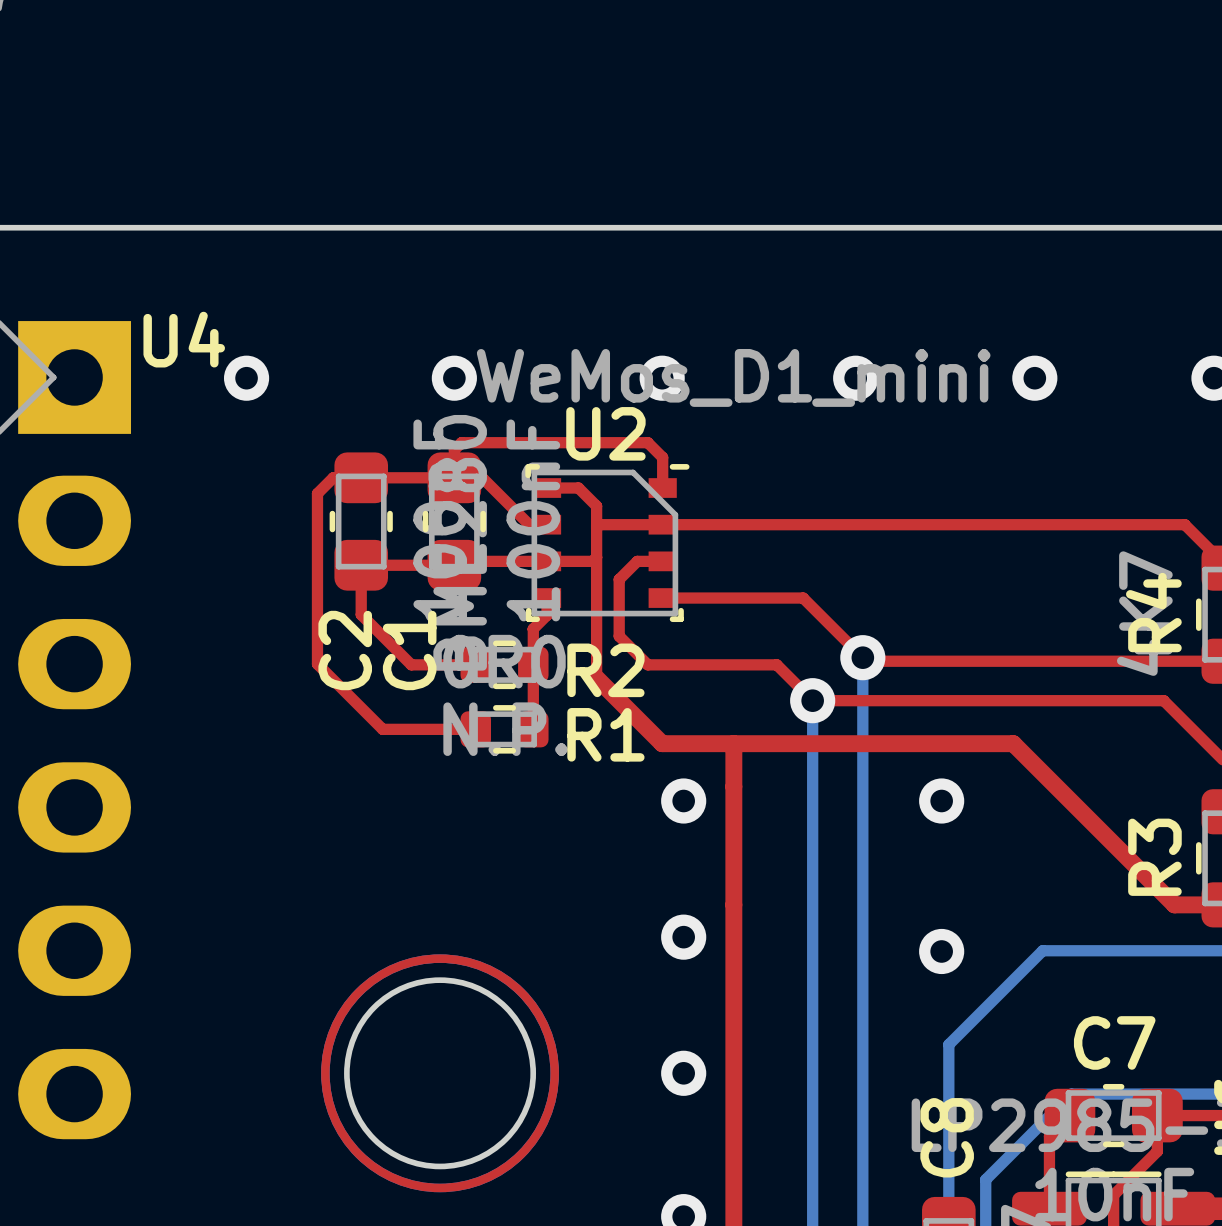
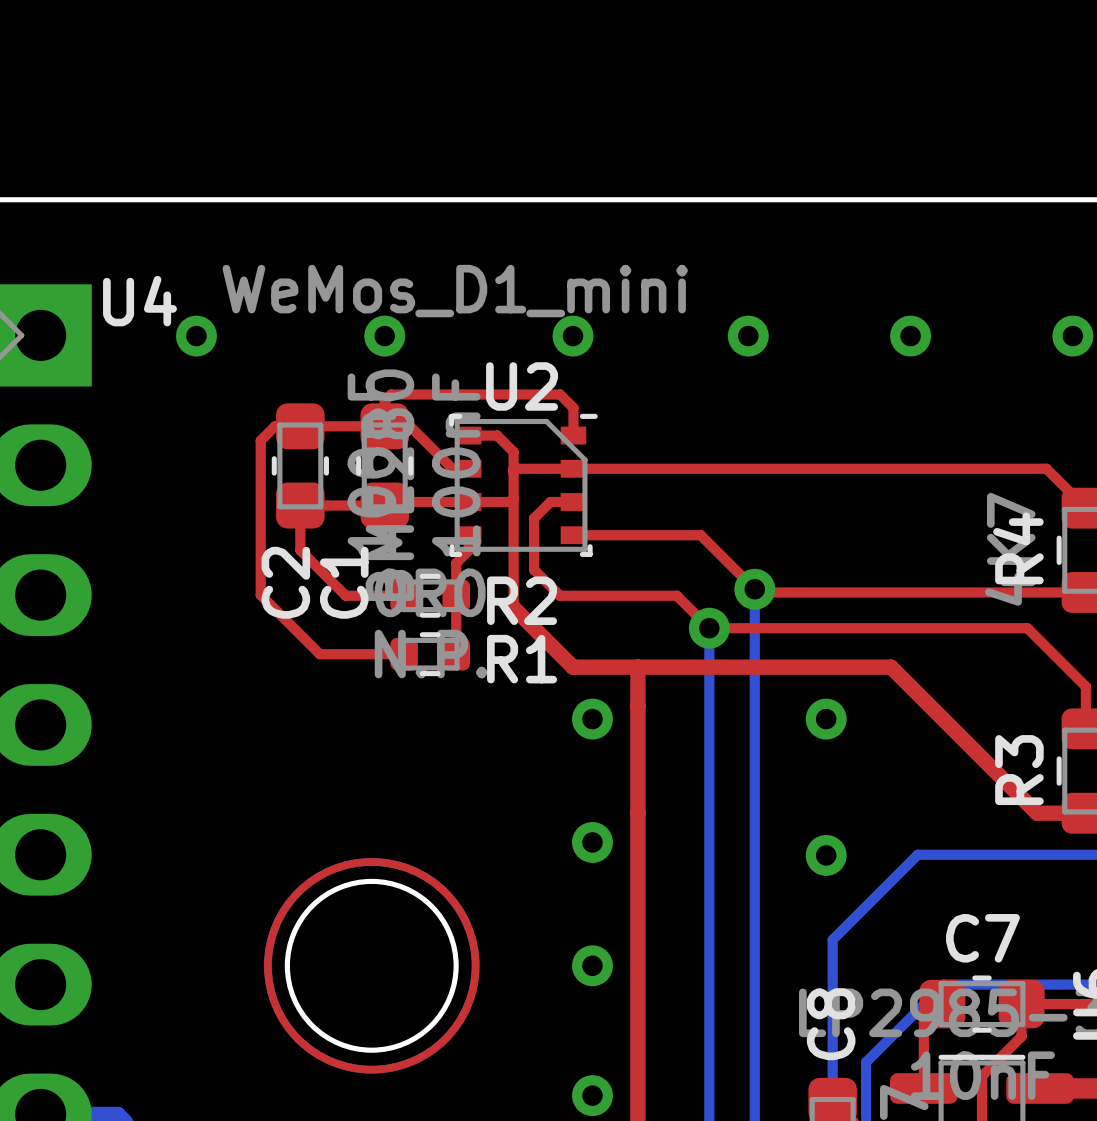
U4 value position: WeMos_D1_mini (733, 377) -> WeMos_D1_mini (455, 291)

